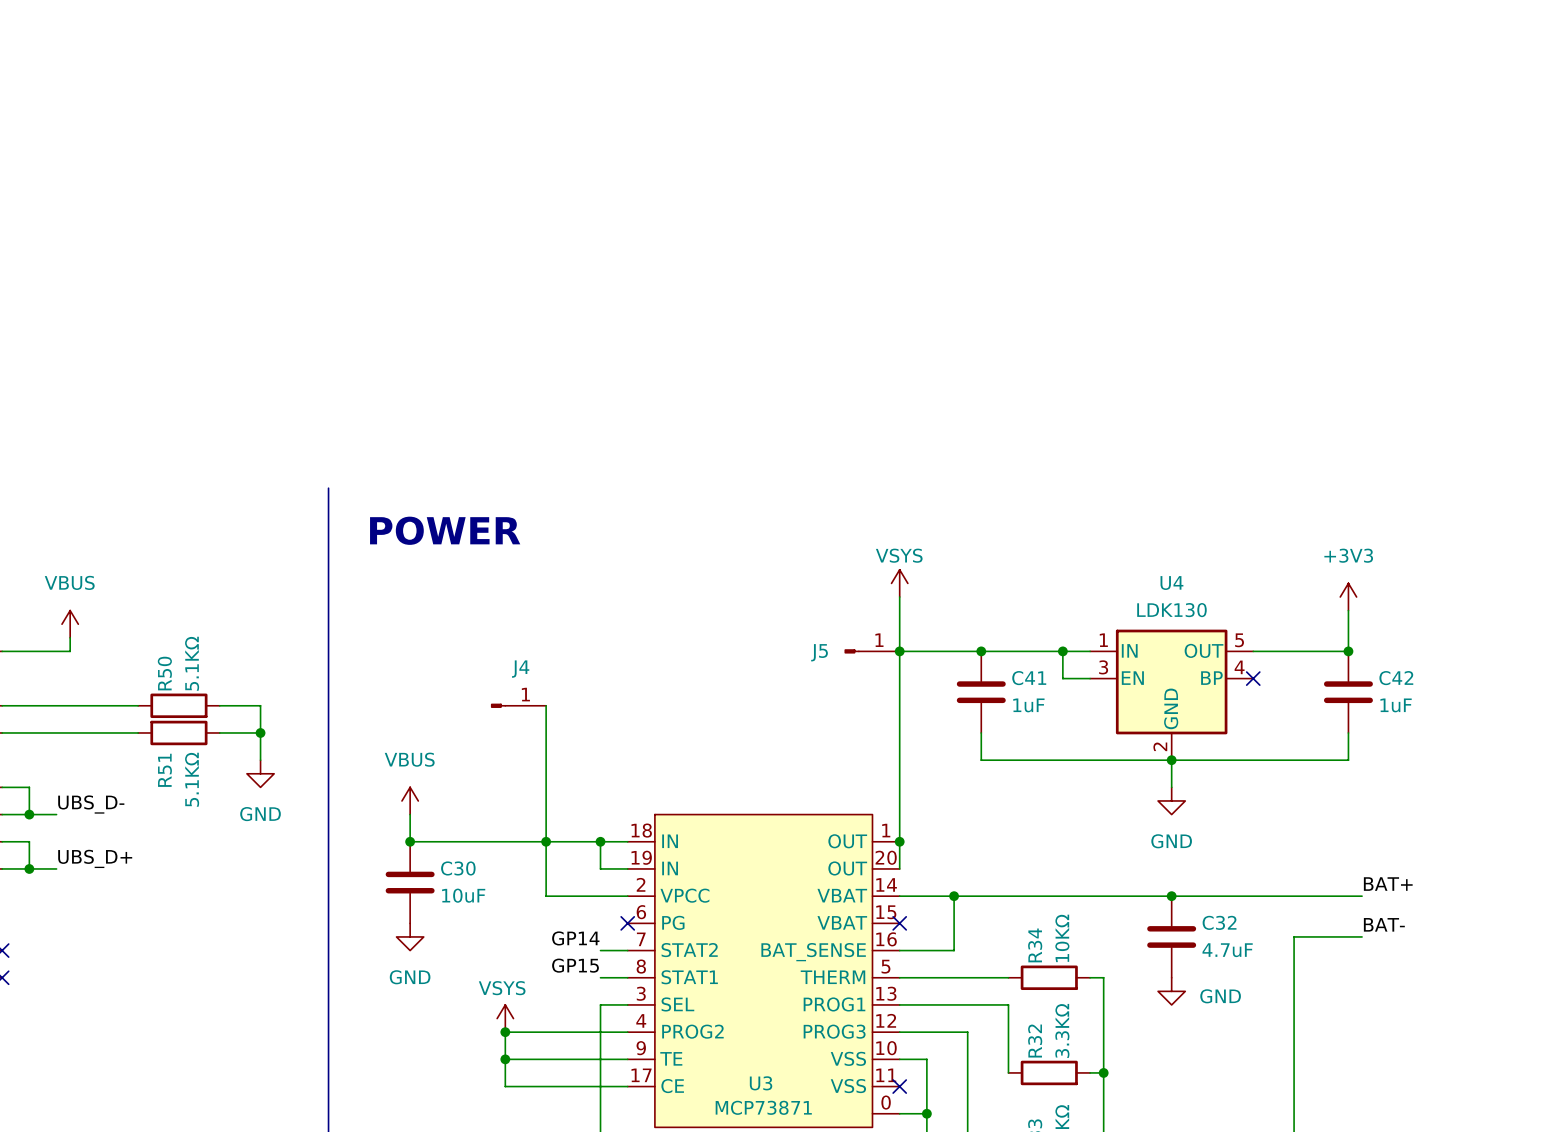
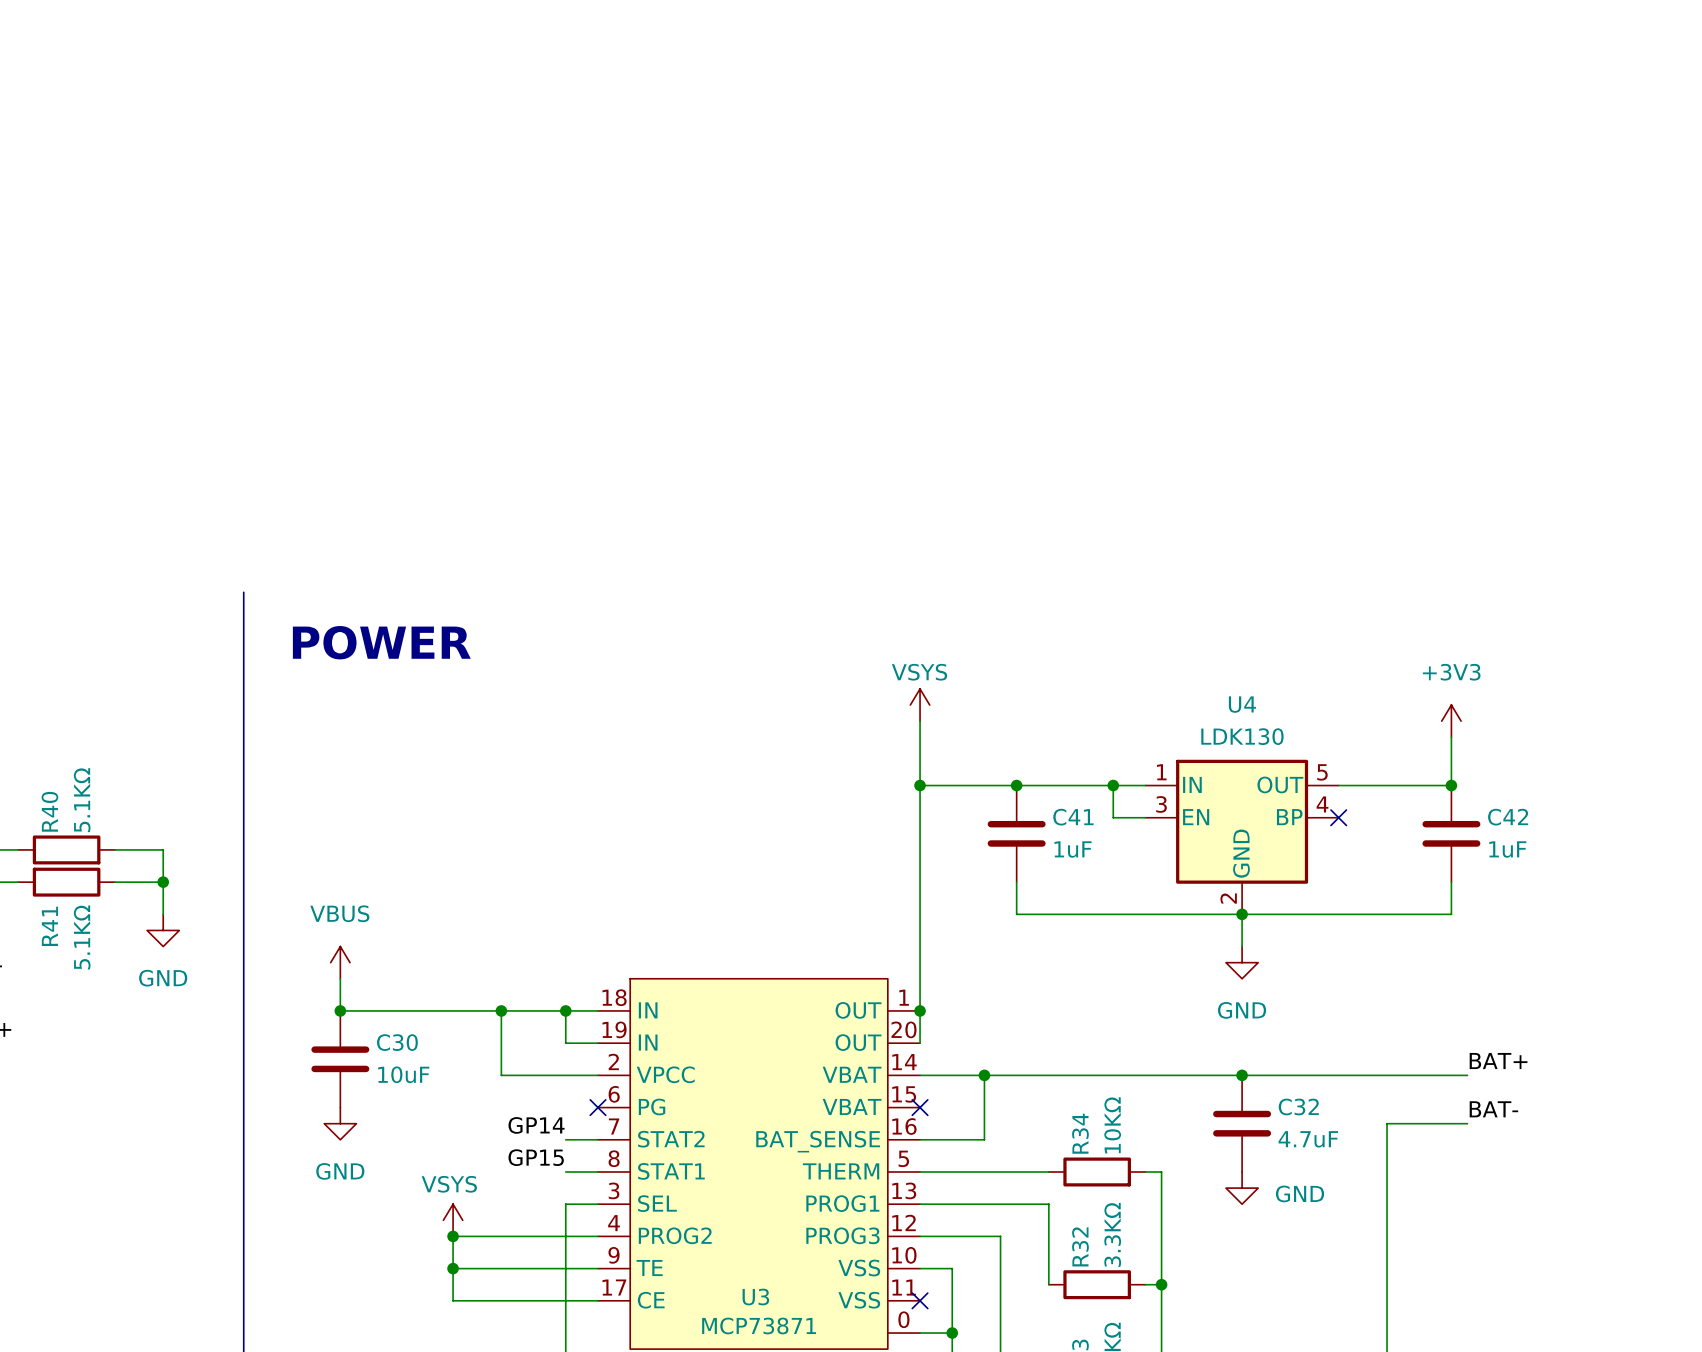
J5: (872, 651) -> none
R50 name: R50 (164, 673) -> R40 (49, 811)
J4: (518, 705) -> none
wire: (546, 705) (546, 841) -> none
R51 name: R51 (164, 770) -> R41 (49, 926)

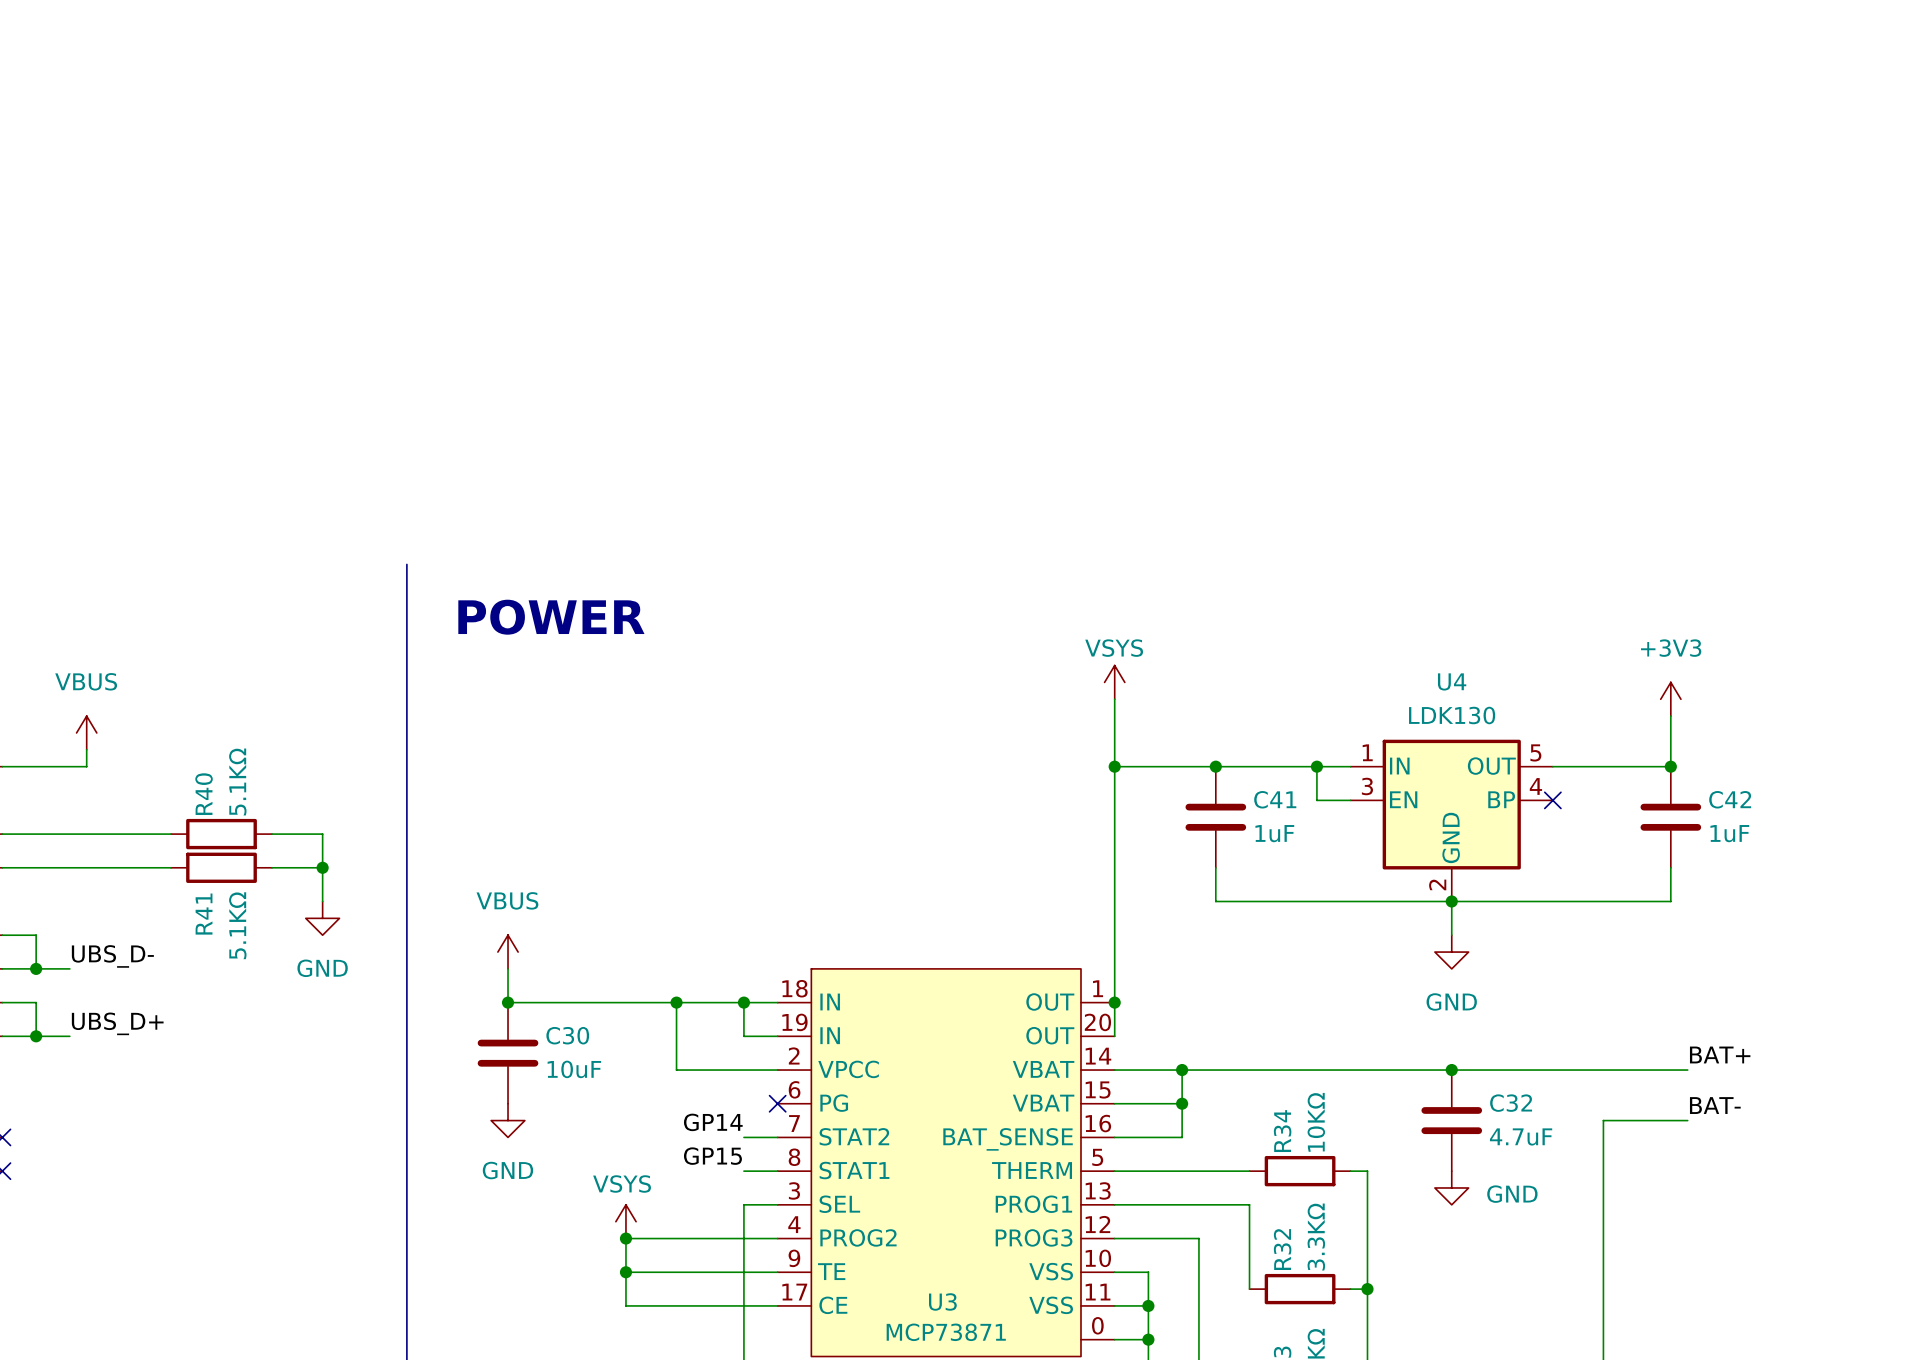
wire: none -> (1114, 1103) (1182, 1103)
no-connect mark: (920, 1107) -> none
junction: none -> (1182, 1103)
wire: none -> (1114, 1305) (1148, 1305)
no-connect mark: (920, 1300) -> none
junction: none -> (1148, 1305)

